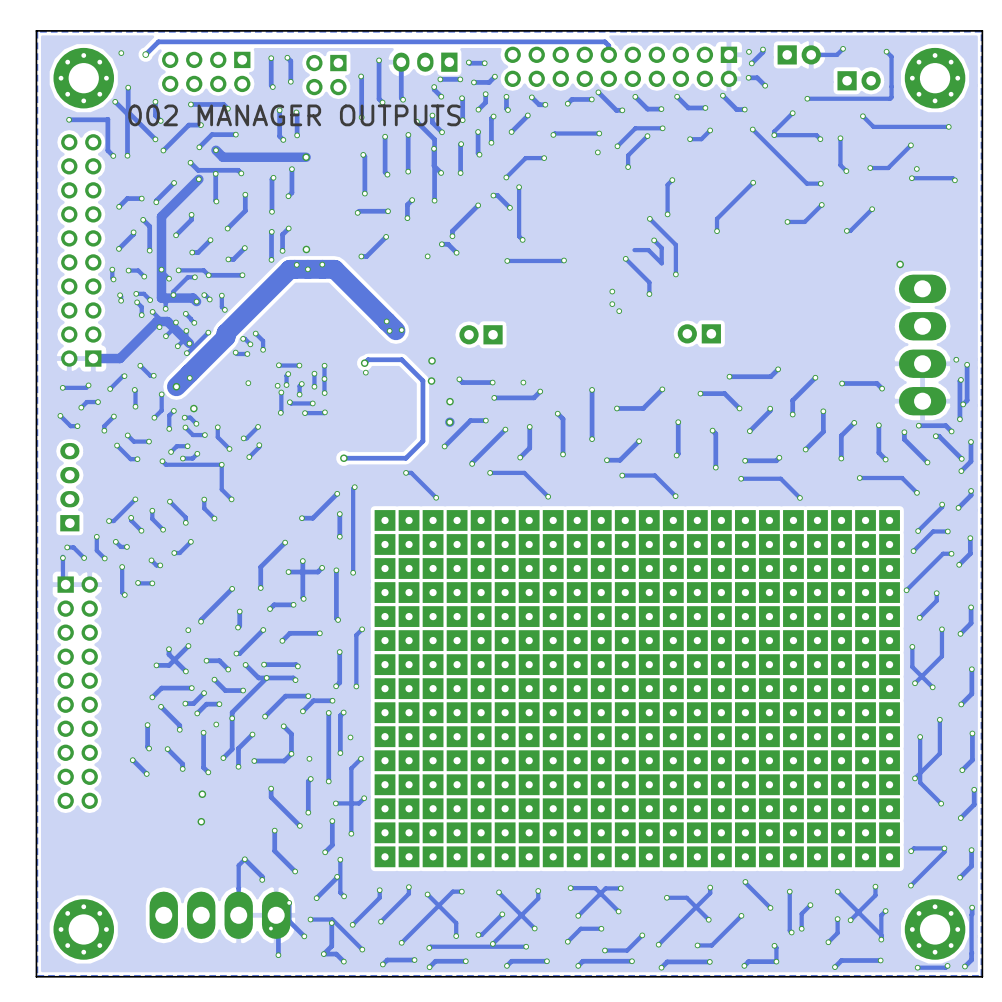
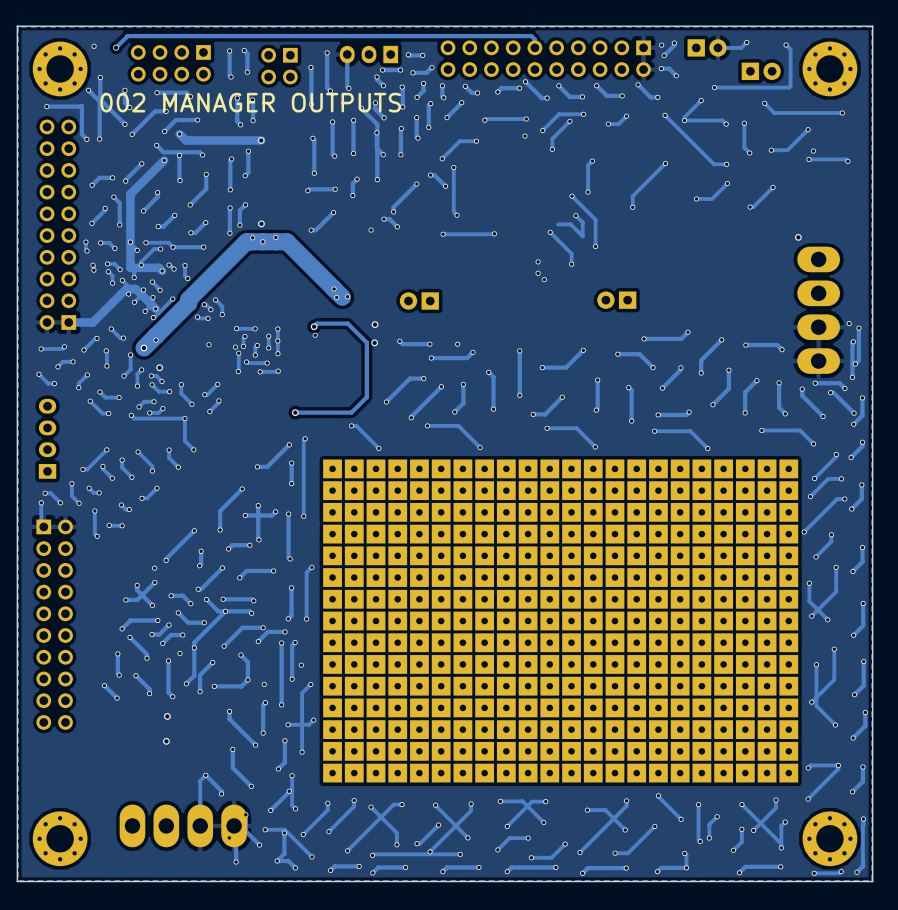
via: (450, 401) -> none
via: (449, 422) -> none

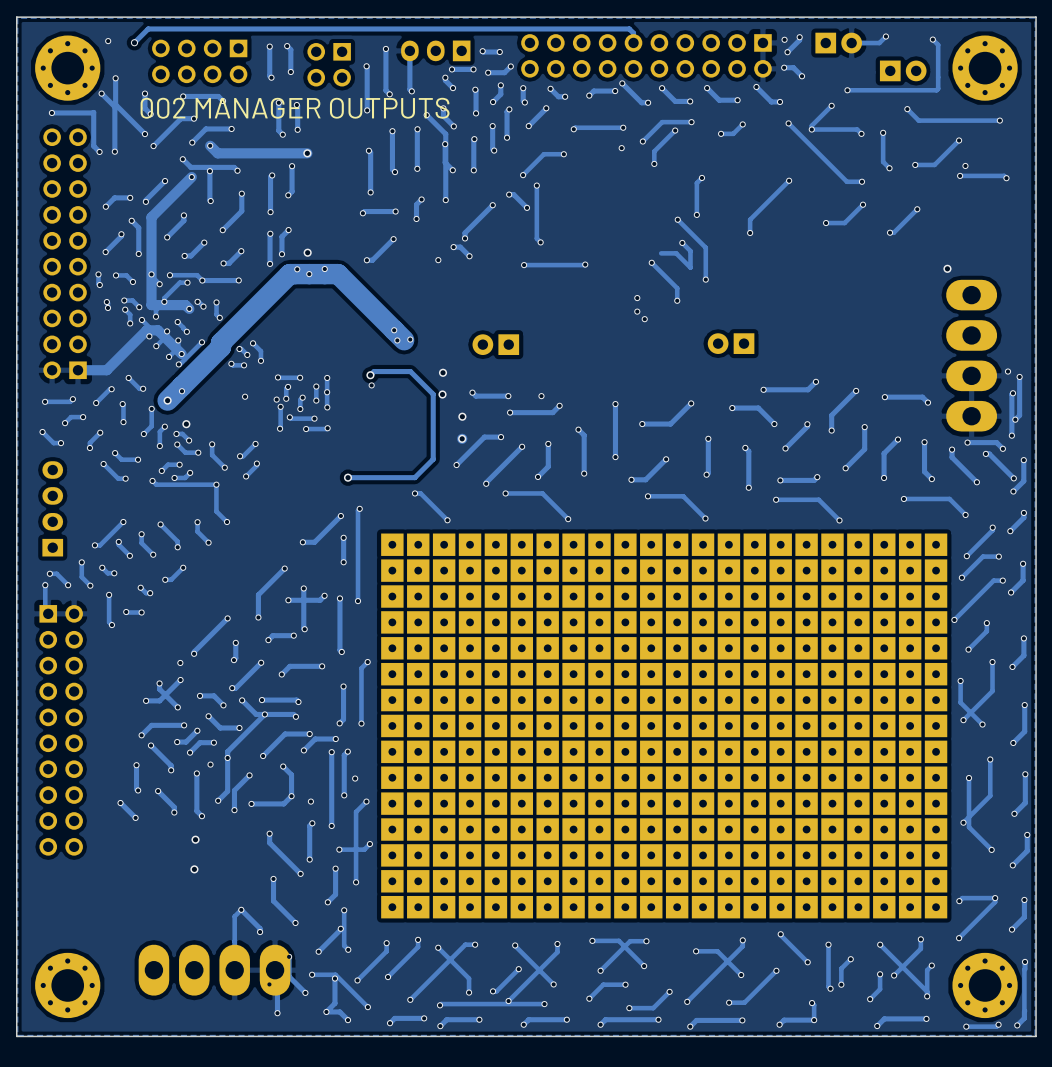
via: none -> (462, 416)
via: none -> (462, 438)

